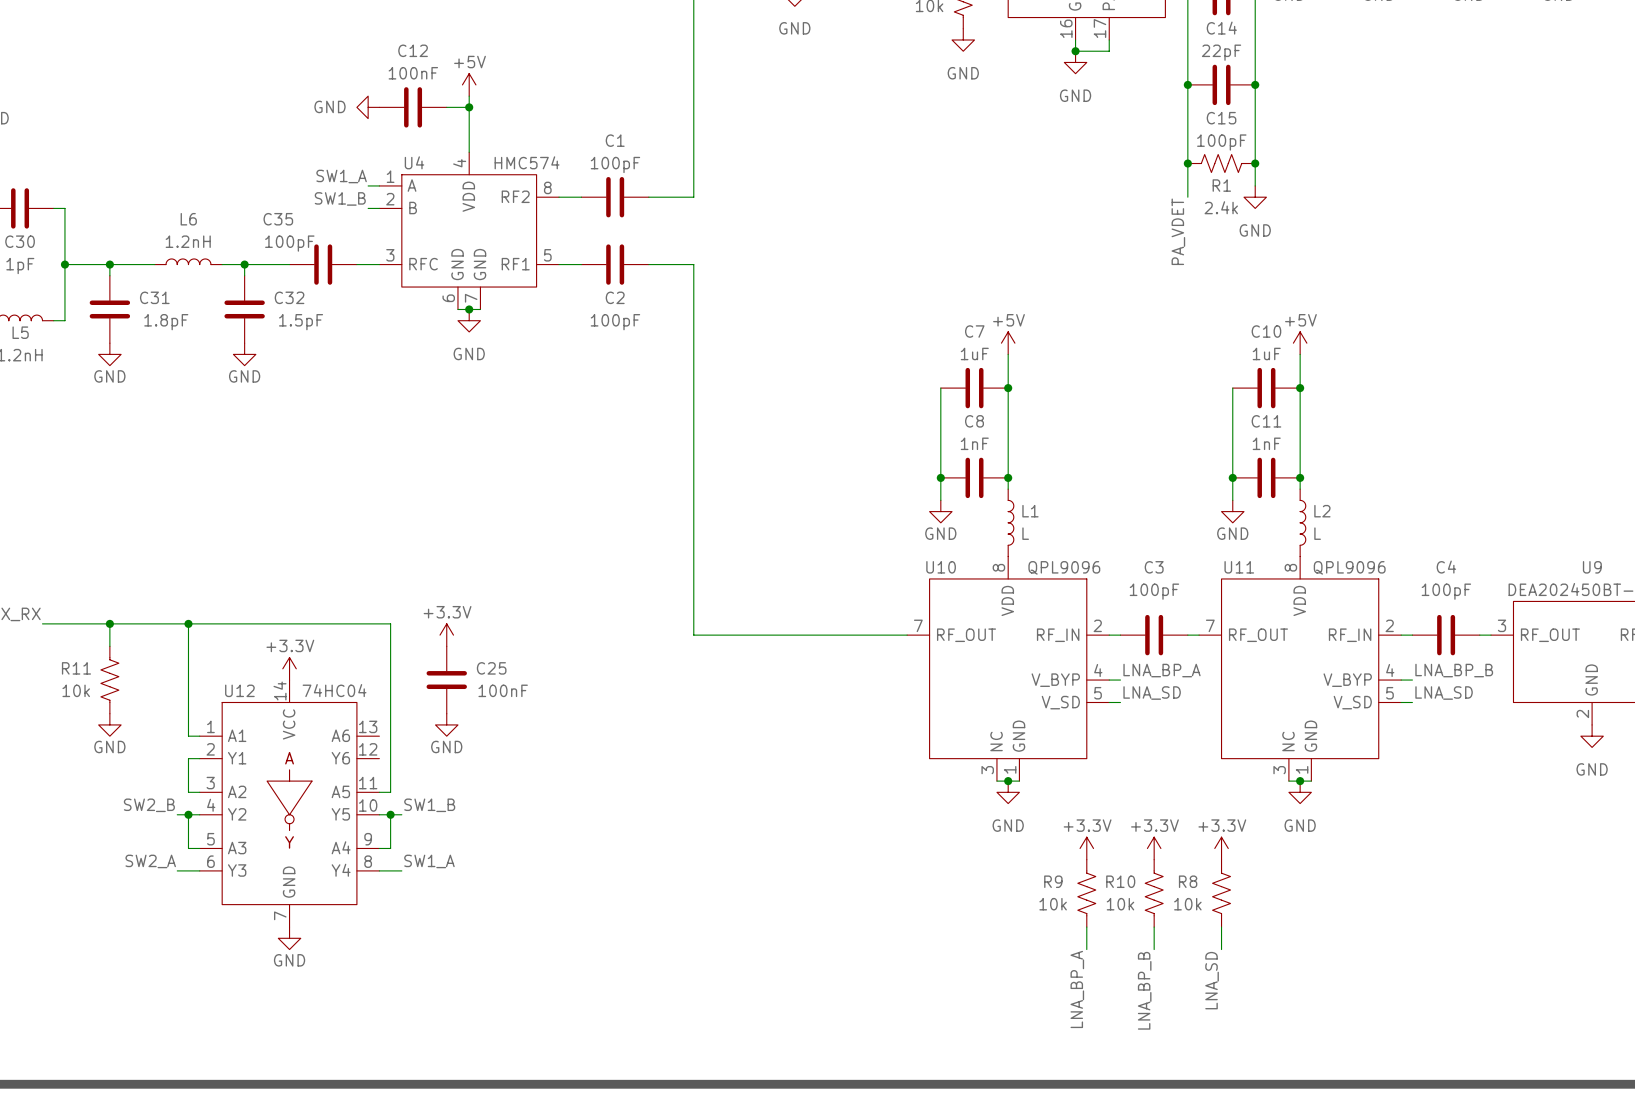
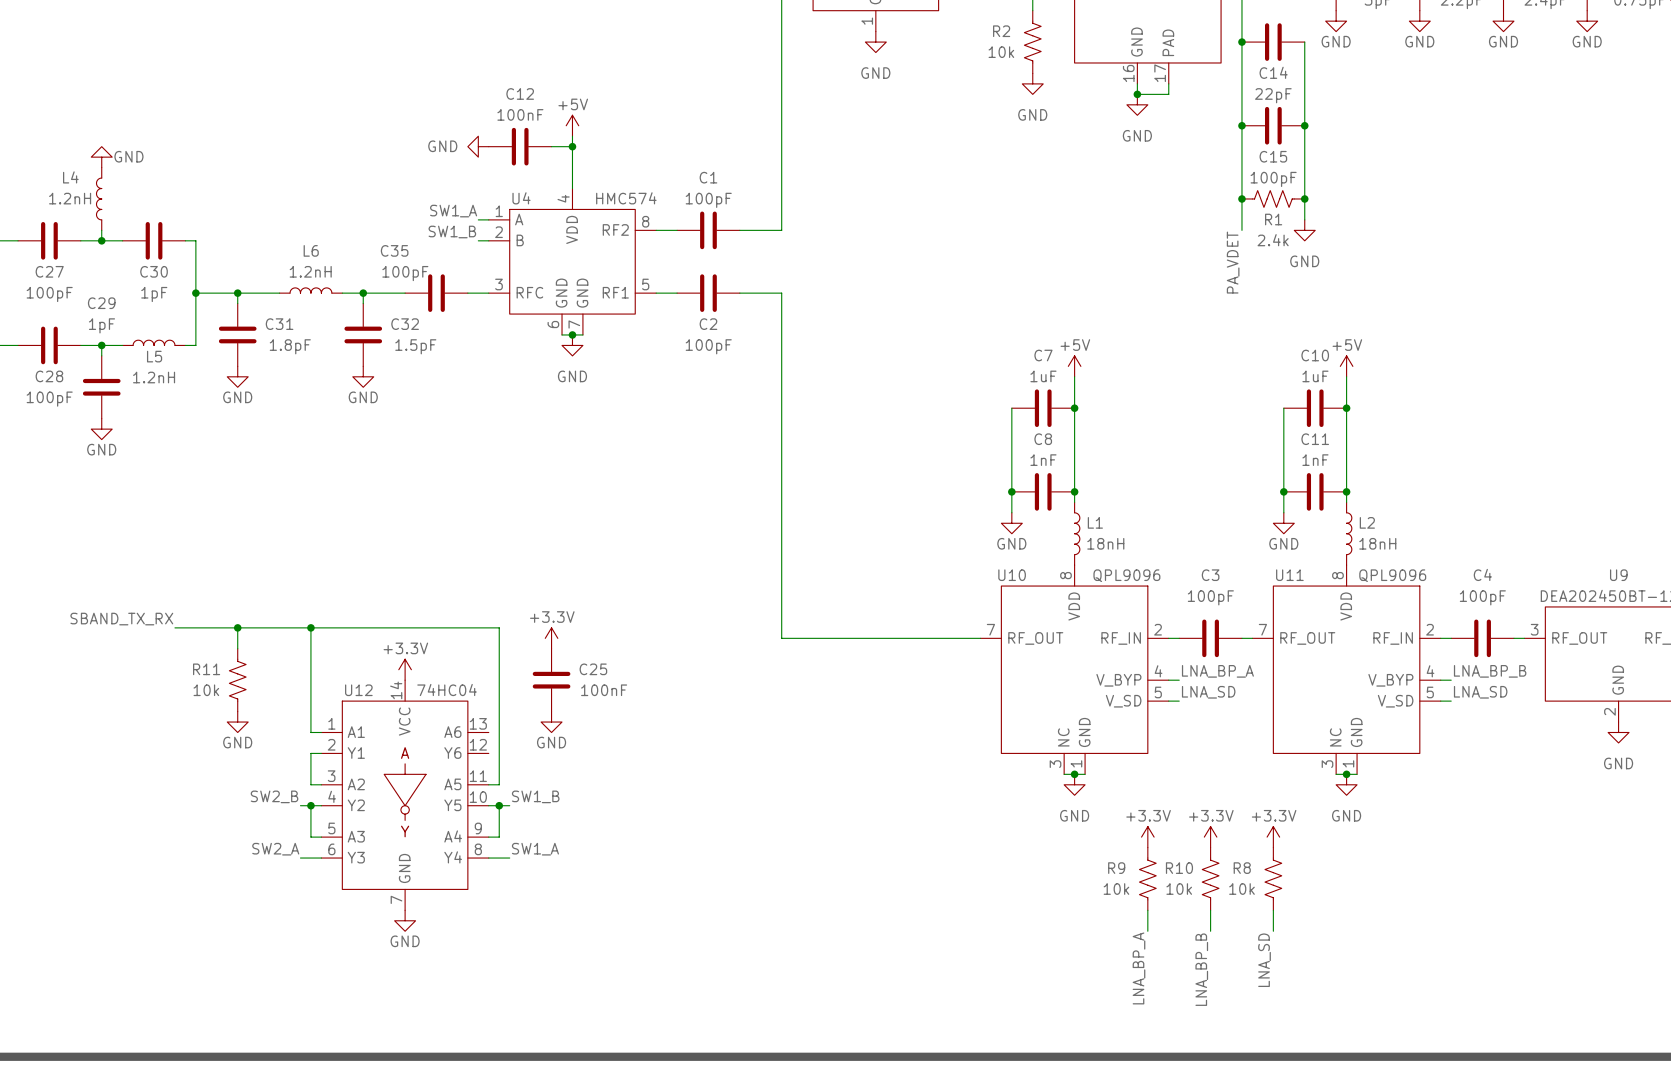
L1 value: L (1025, 533) -> 18nH (1105, 543)
L2 value: L (1317, 533) -> 18nH (1377, 543)

